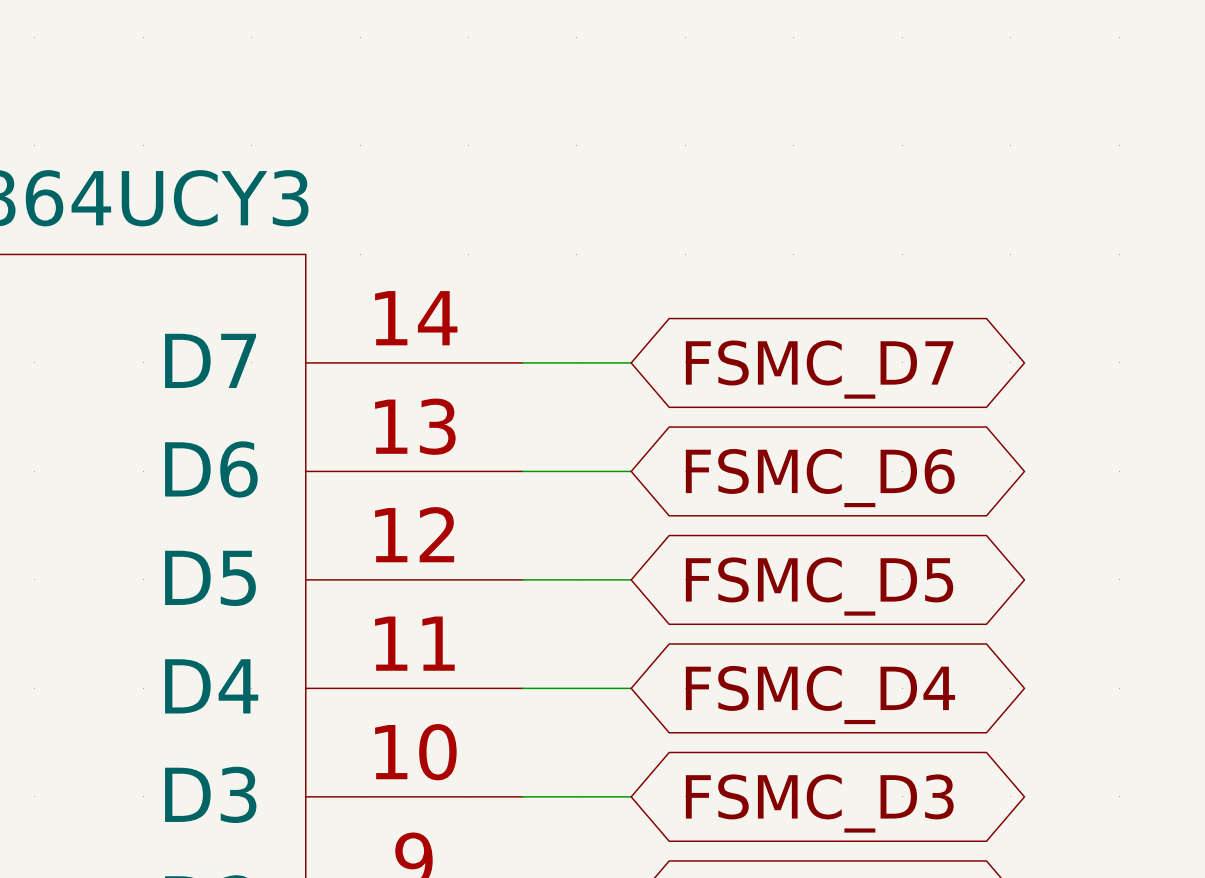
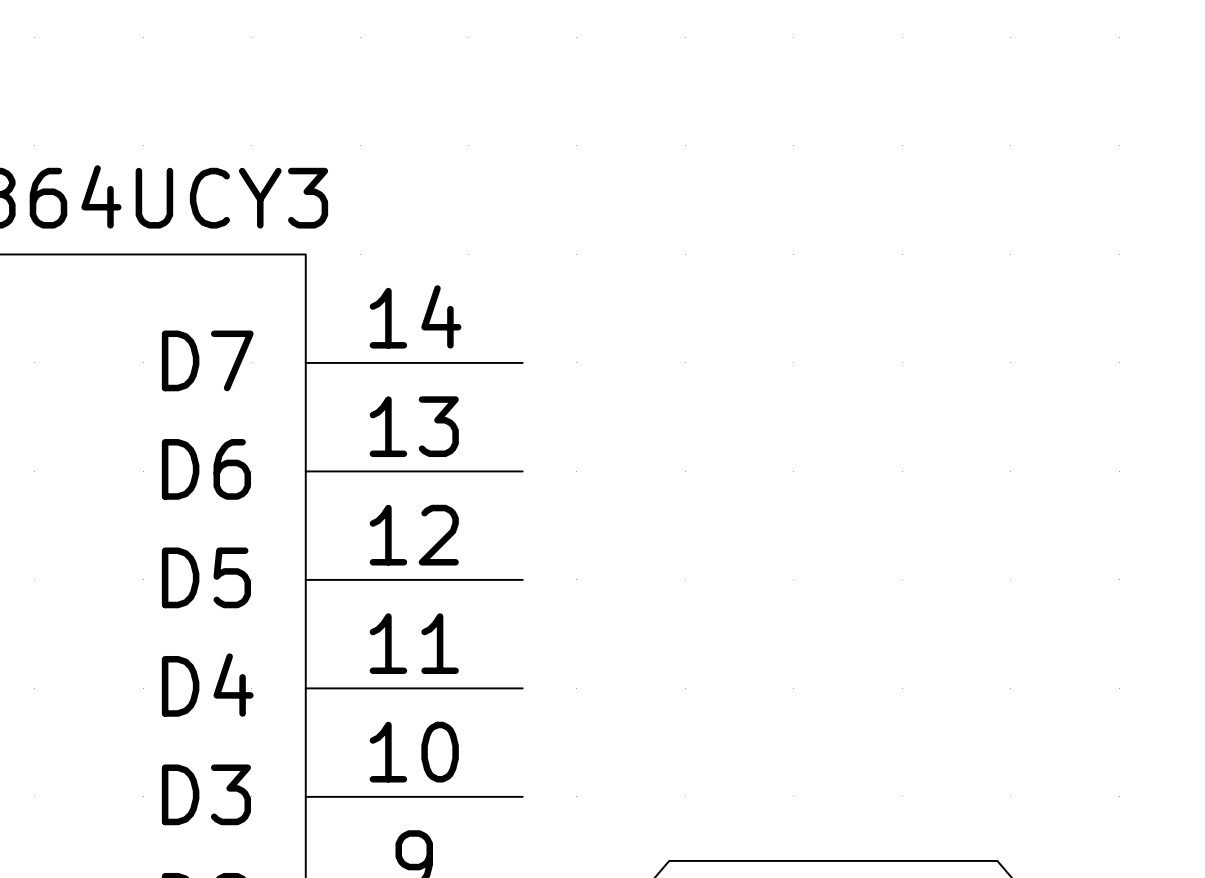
wire: (522, 362) (631, 362) -> none
global label: FSMC_D7 (819, 369) -> none
wire: (522, 471) (631, 471) -> none
global label: FSMC_D6 (820, 478) -> none
wire: (522, 579) (631, 579) -> none
global label: FSMC_D5 (819, 586) -> none
wire: (522, 688) (631, 688) -> none
global label: FSMC_D4 (820, 695) -> none
wire: (522, 796) (631, 796) -> none
global label: FSMC_D3 (819, 803) -> none

